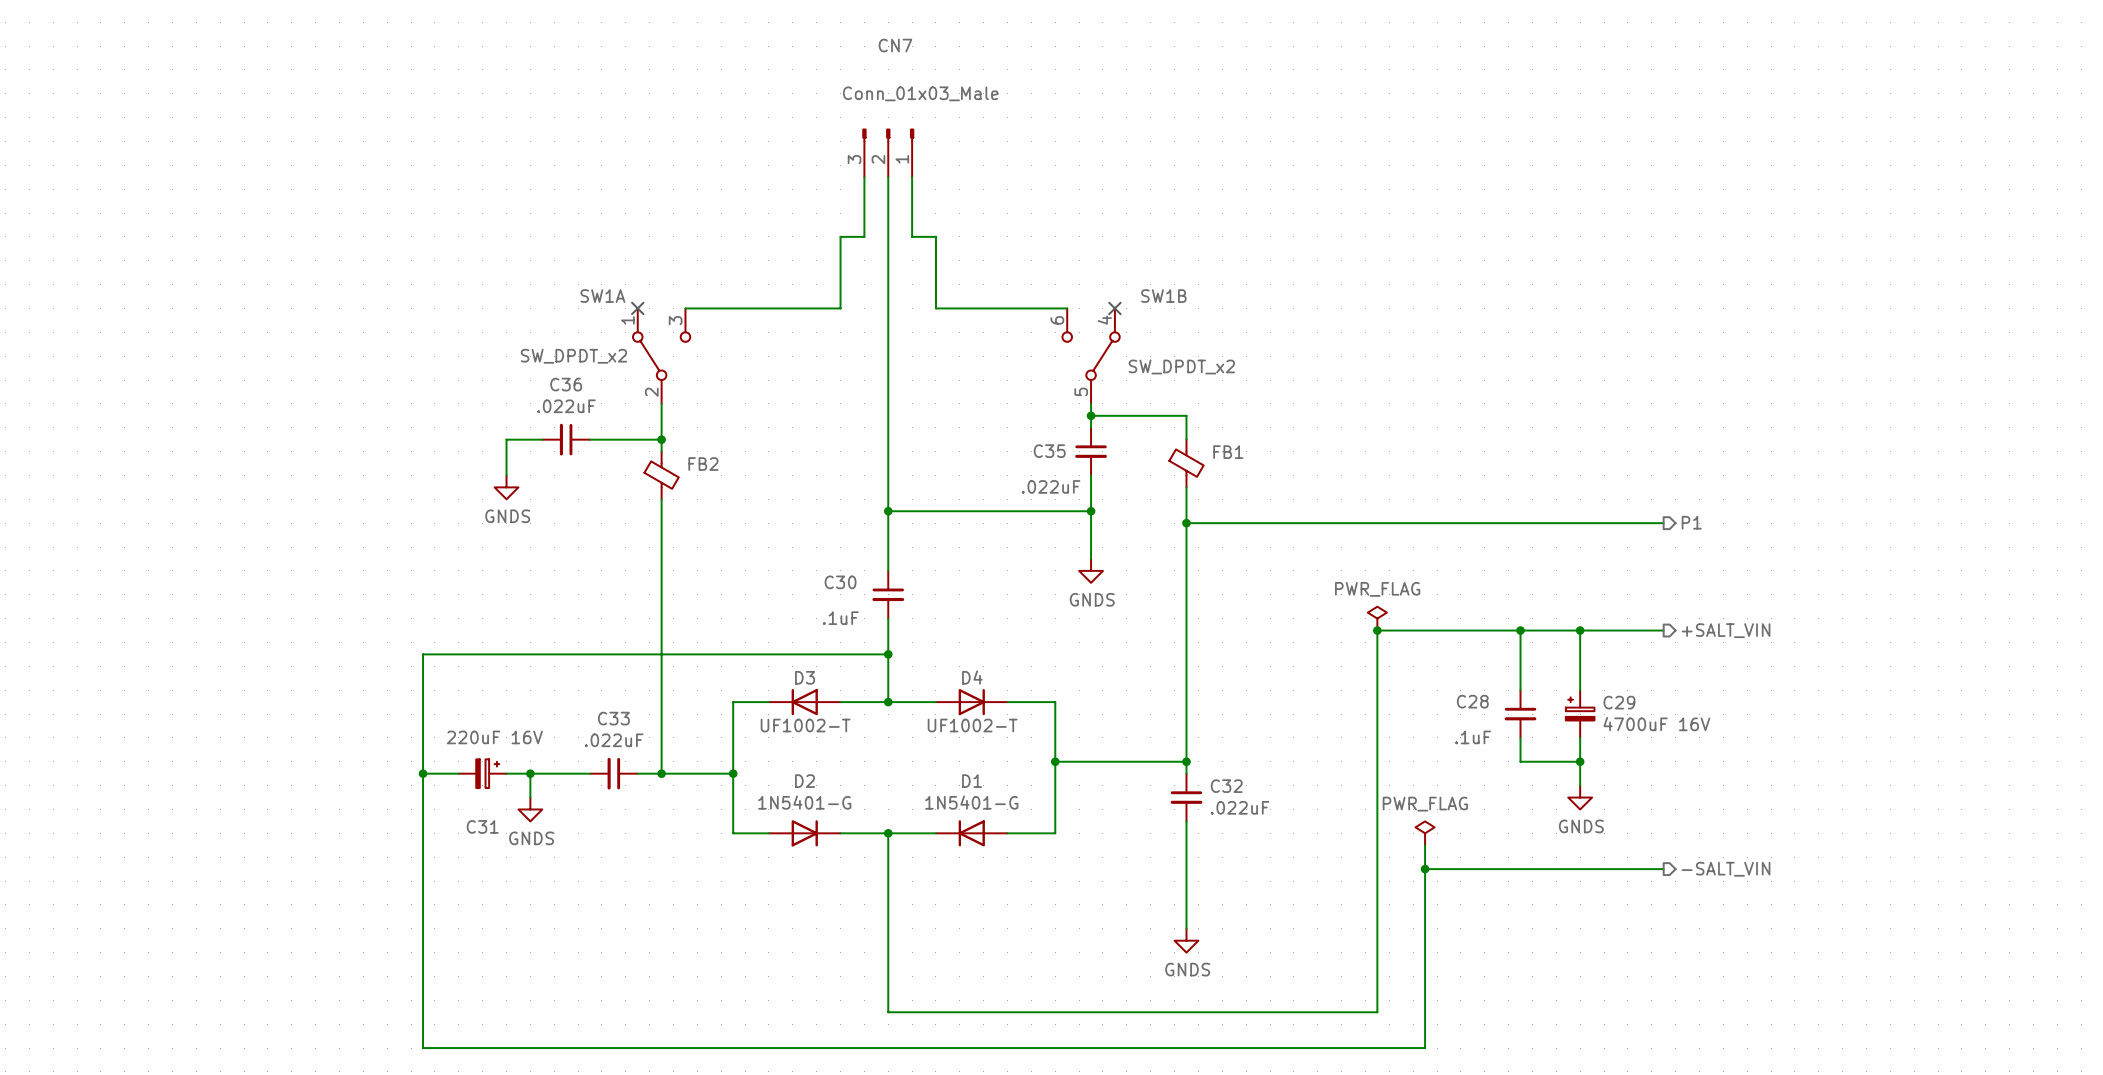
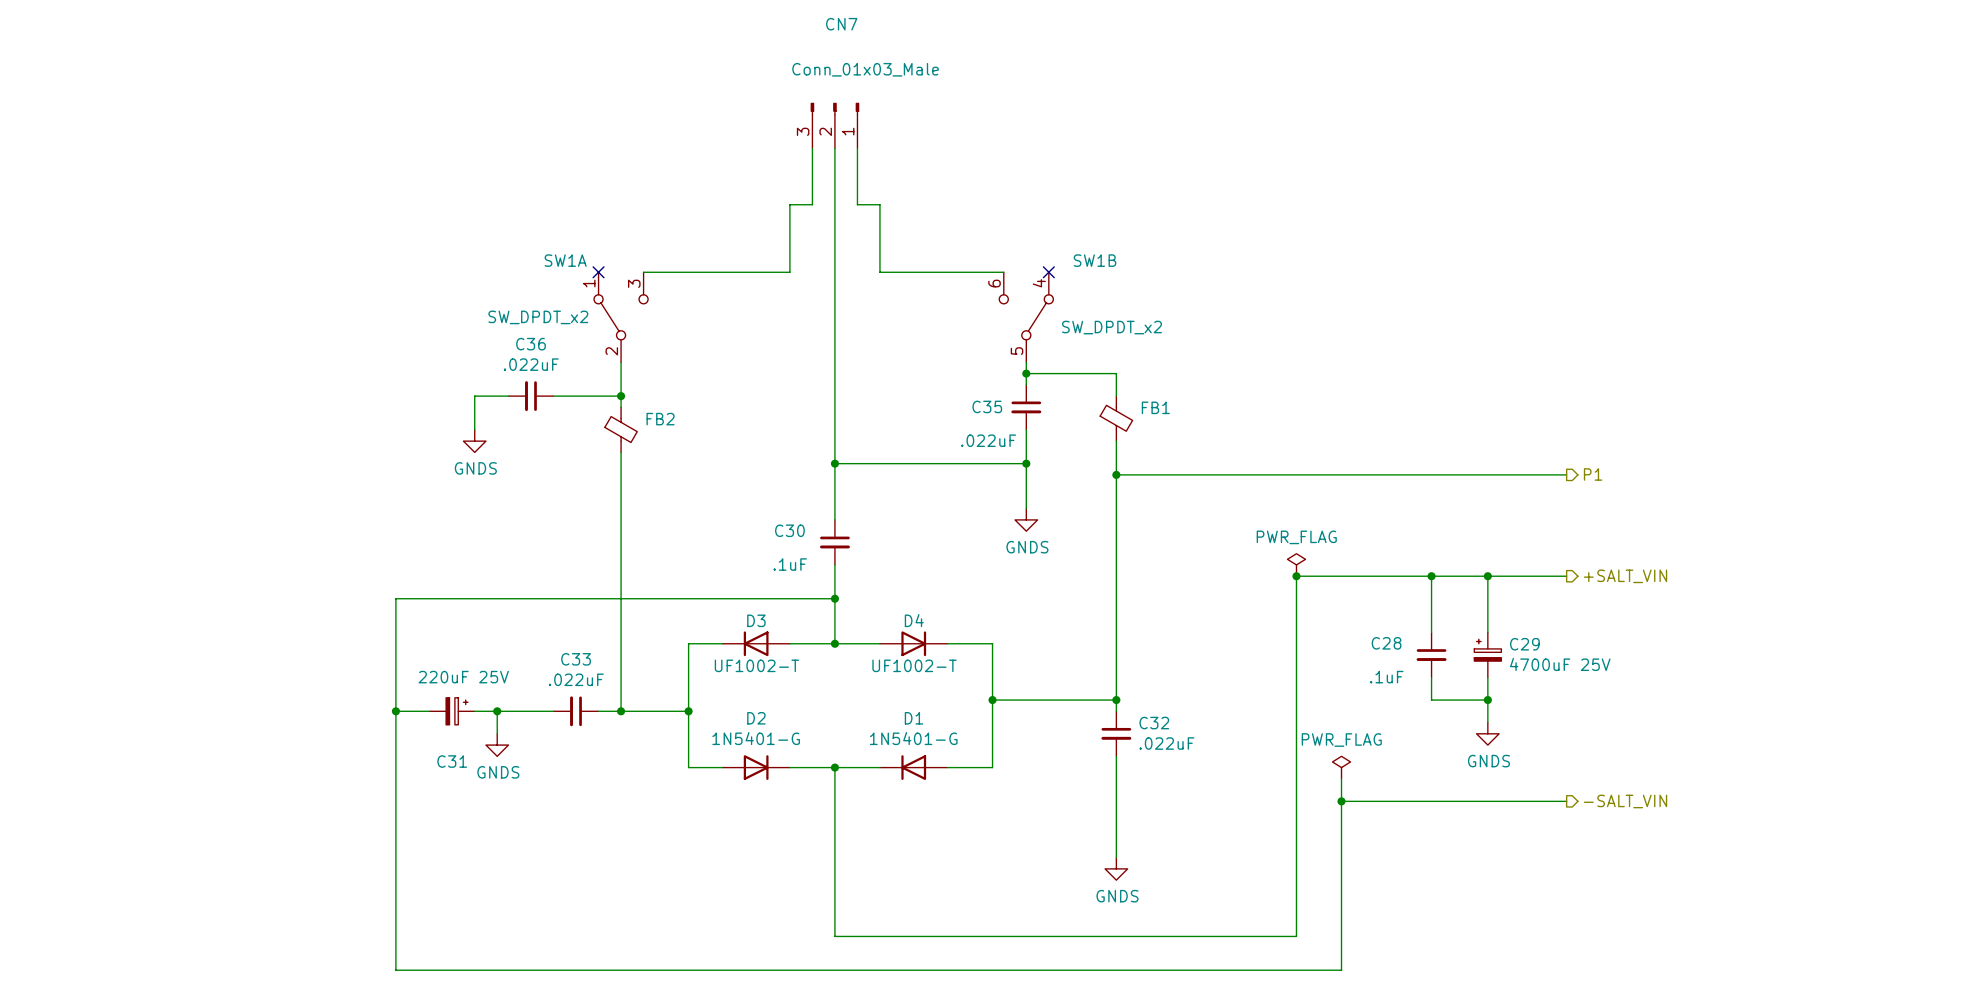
C29 value: 4700uF 16V (1656, 724) -> 4700uF 25V (1560, 664)
C31 value: 220uF 16V (494, 737) -> 220uF 25V (463, 677)

